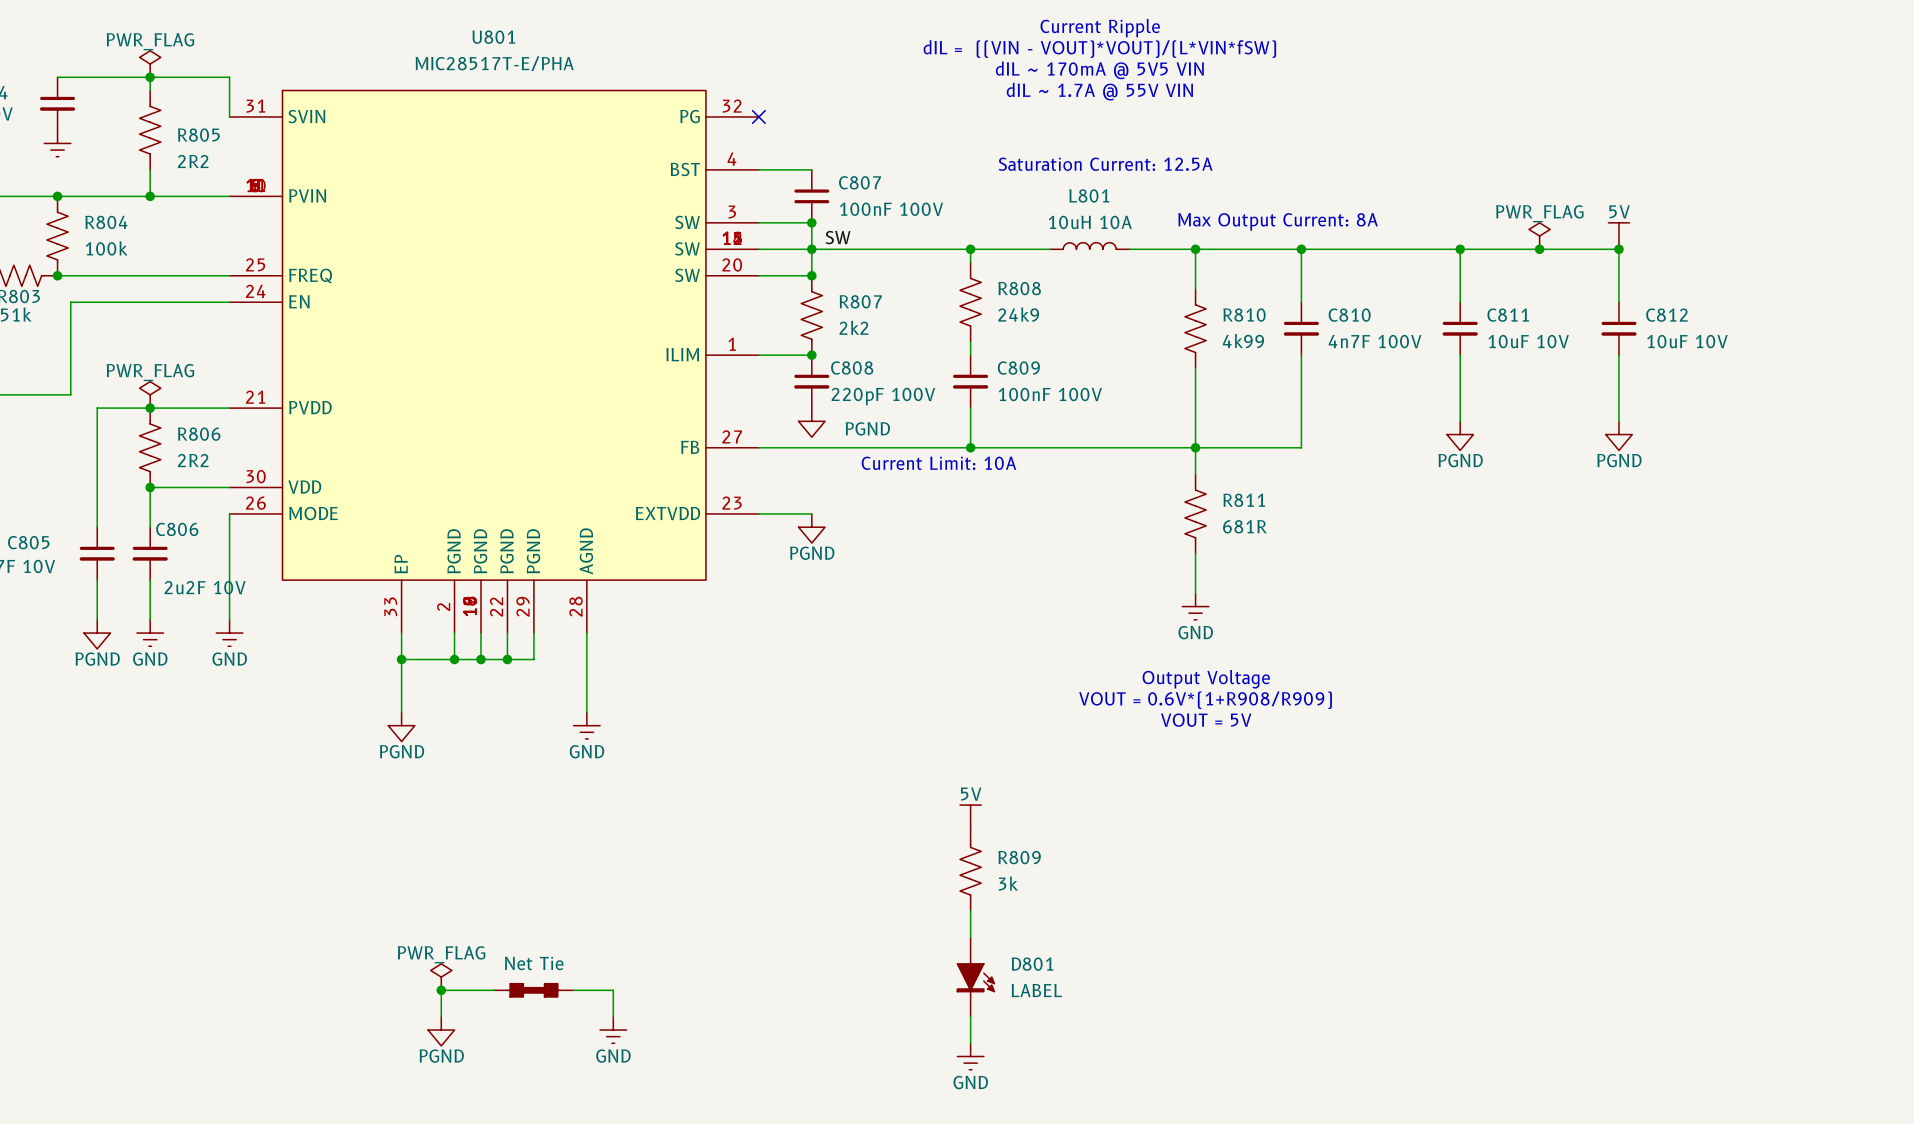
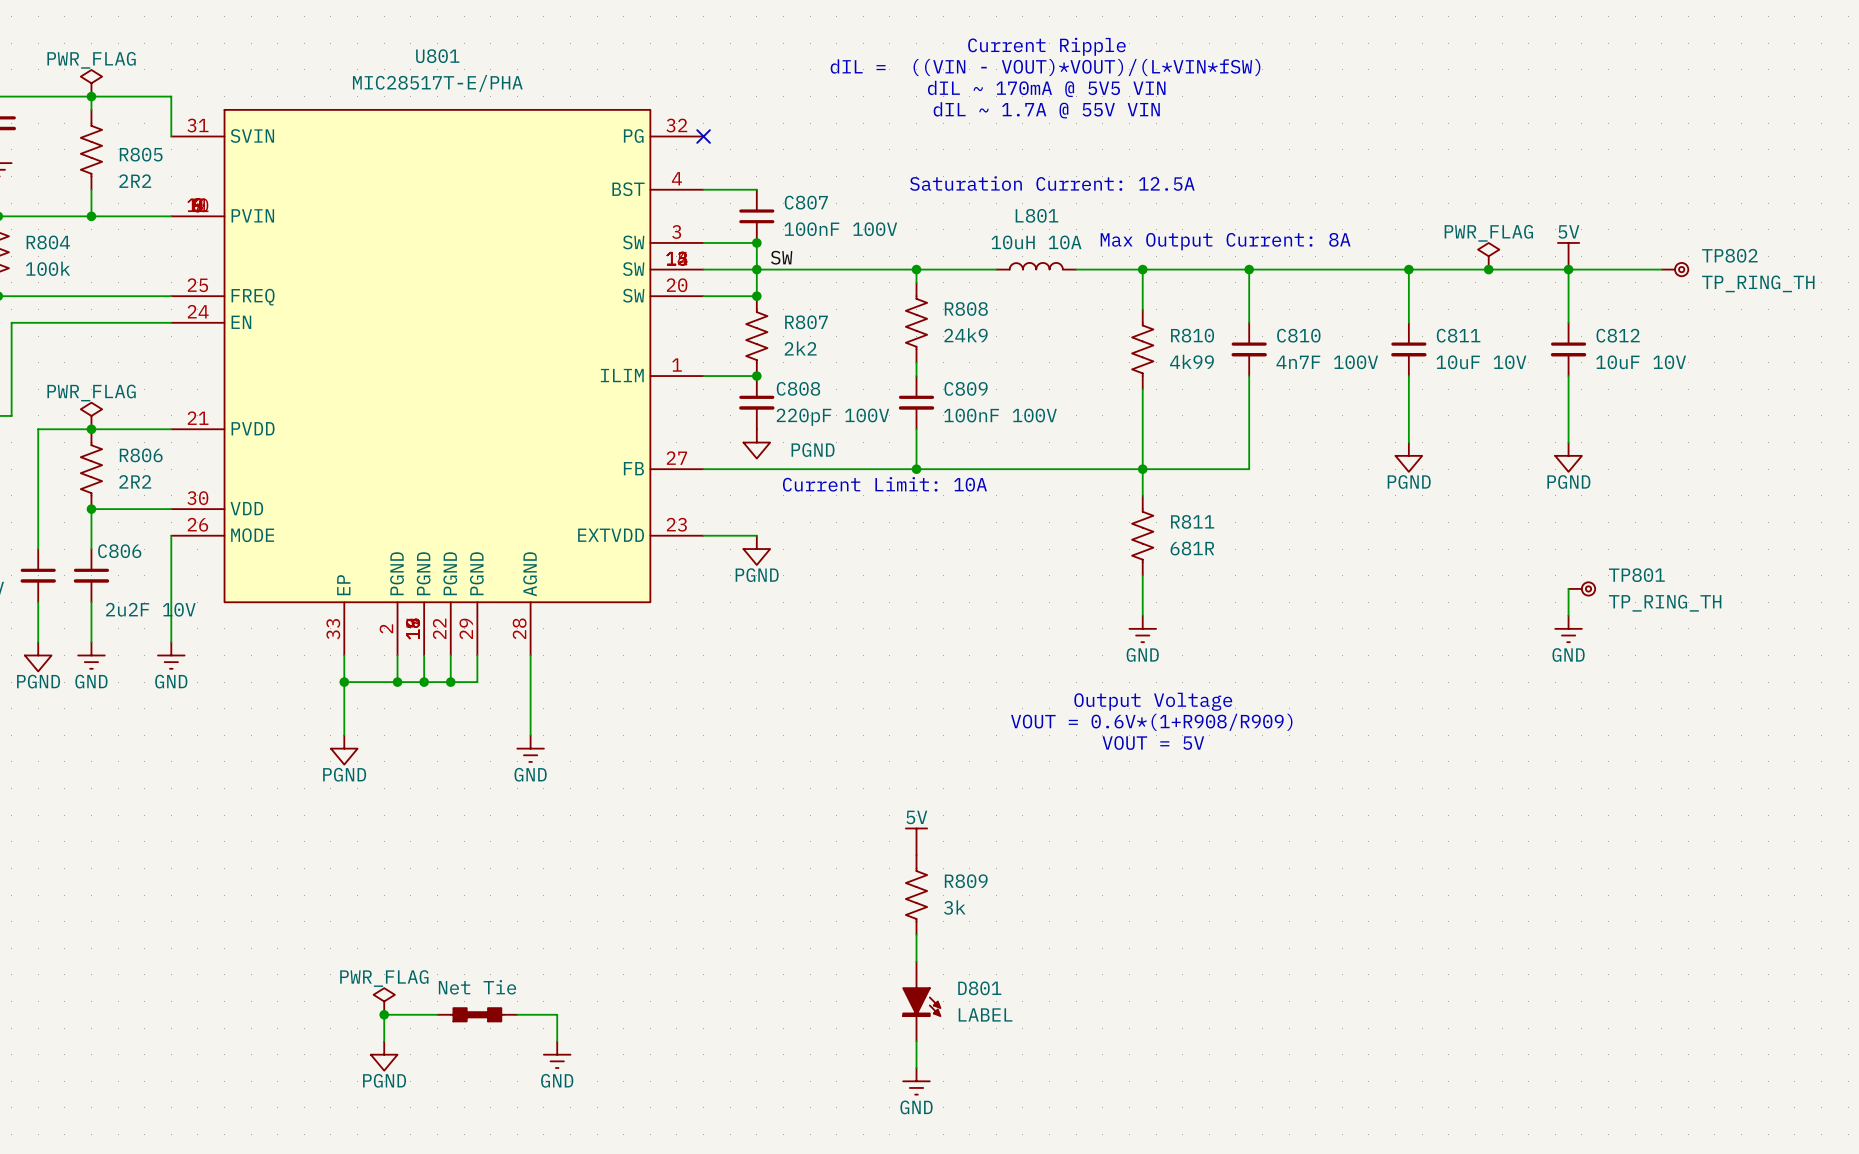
wire: none -> (1568, 269) (1661, 269)
TP802: none -> TP_RING_TH (1675, 269)
wire: none -> (1568, 588) (1568, 615)
TP801: none -> TP_RING_TH (1581, 588)
power symbol: none -> GND (1568, 628)

